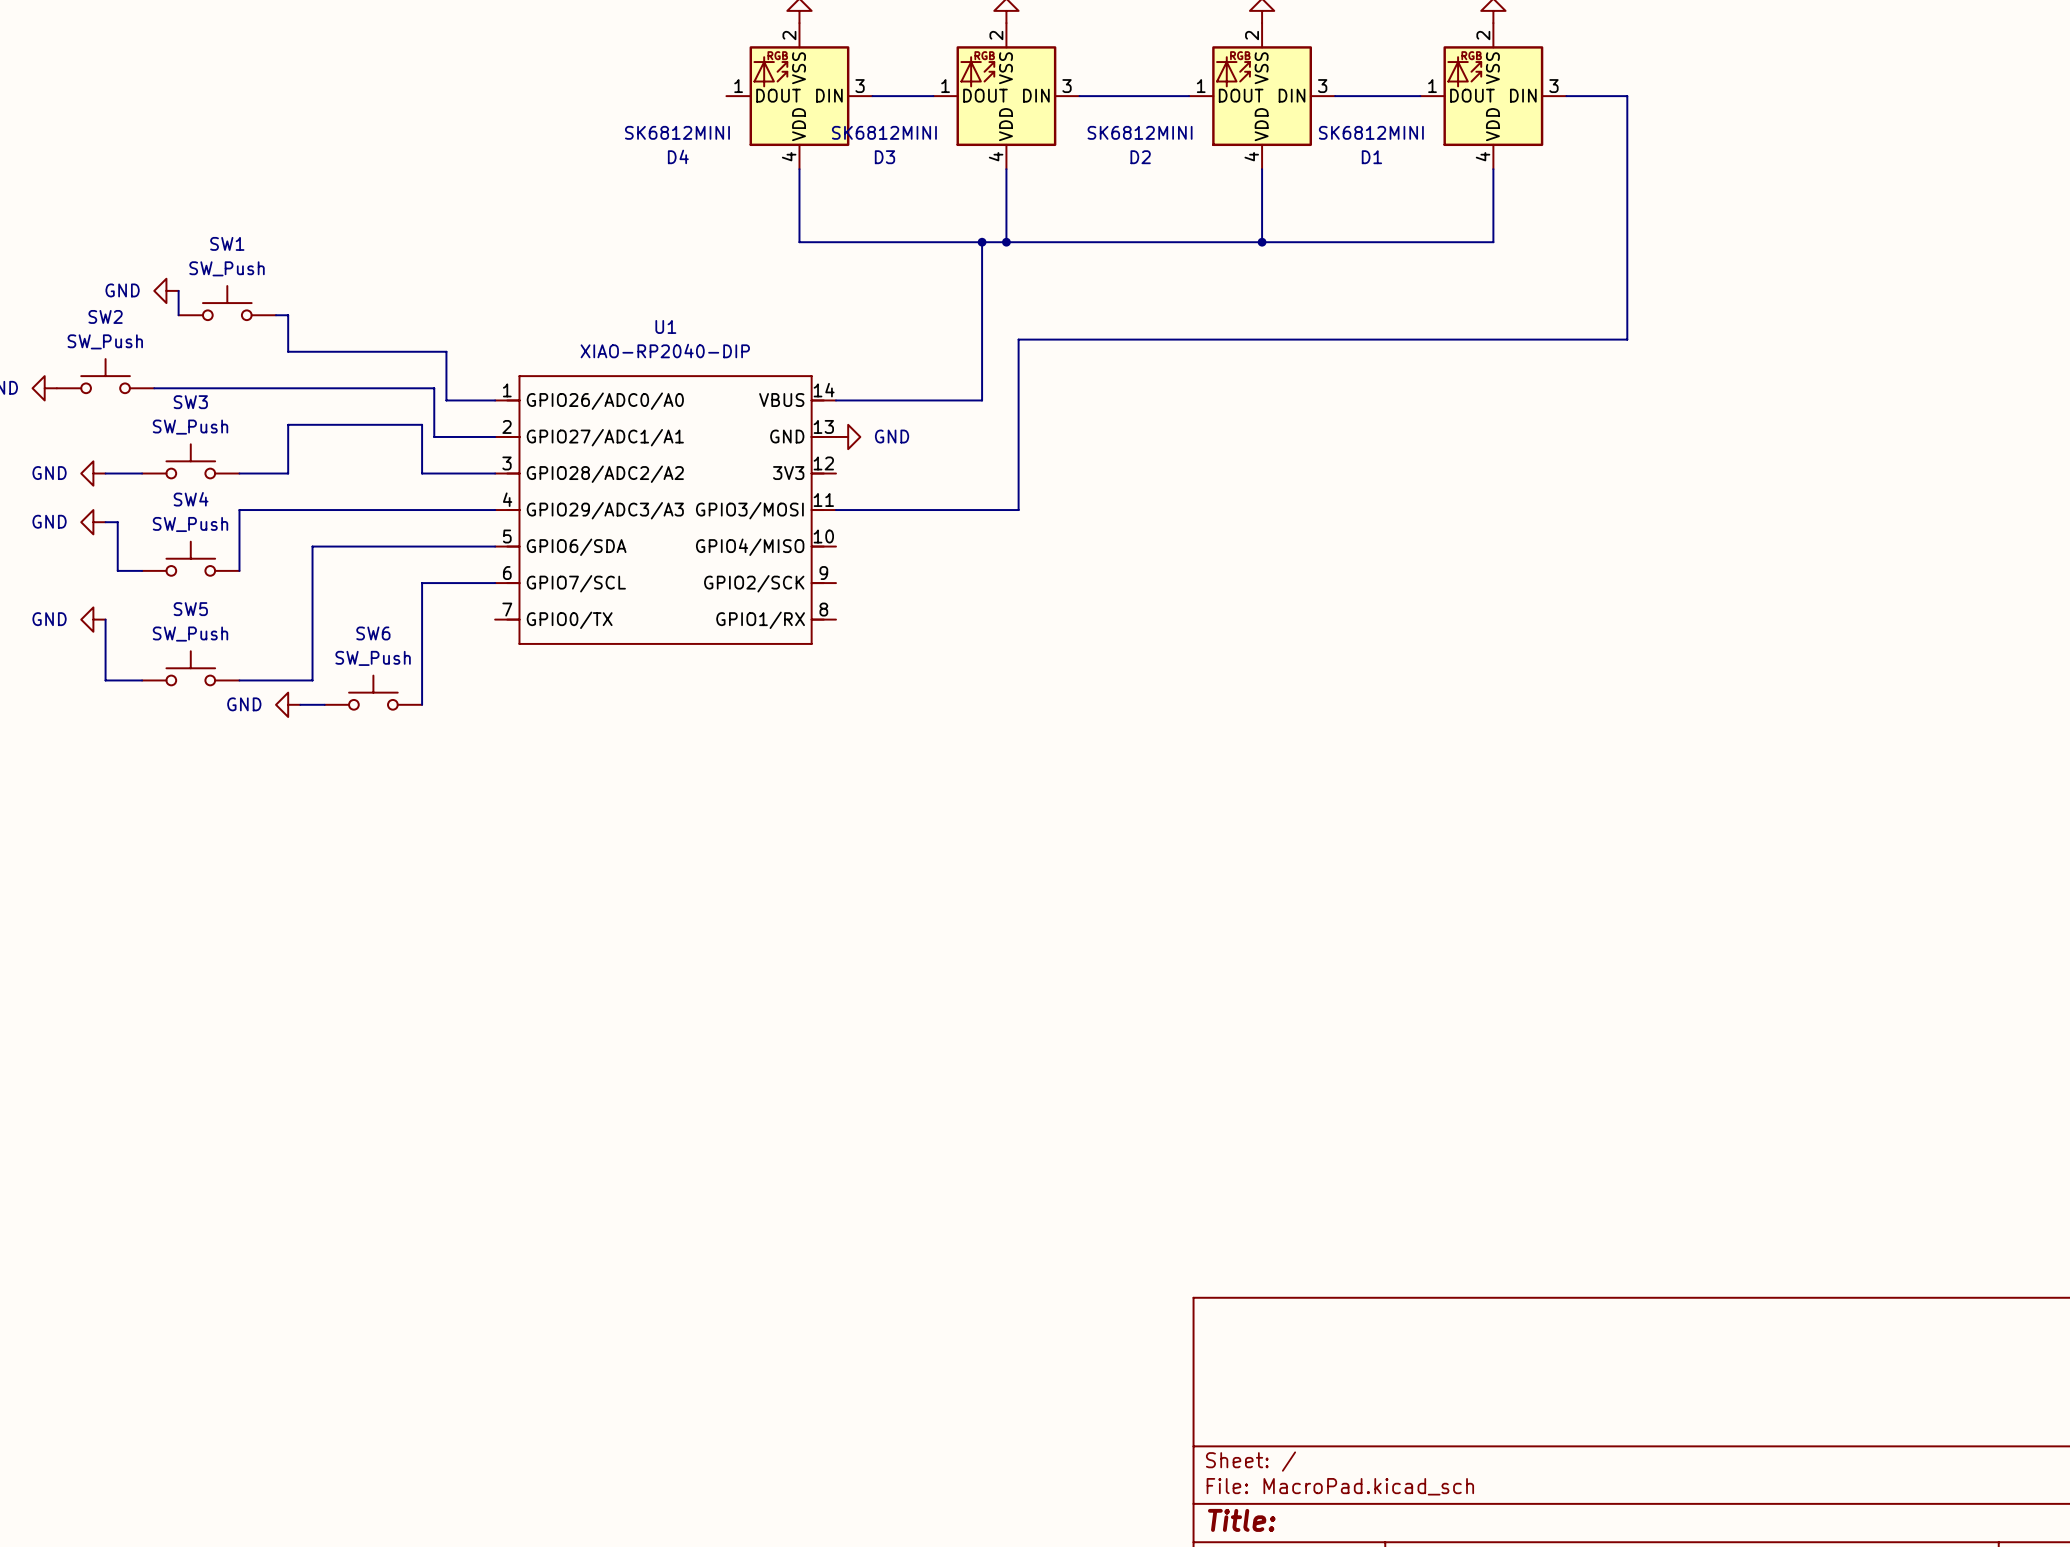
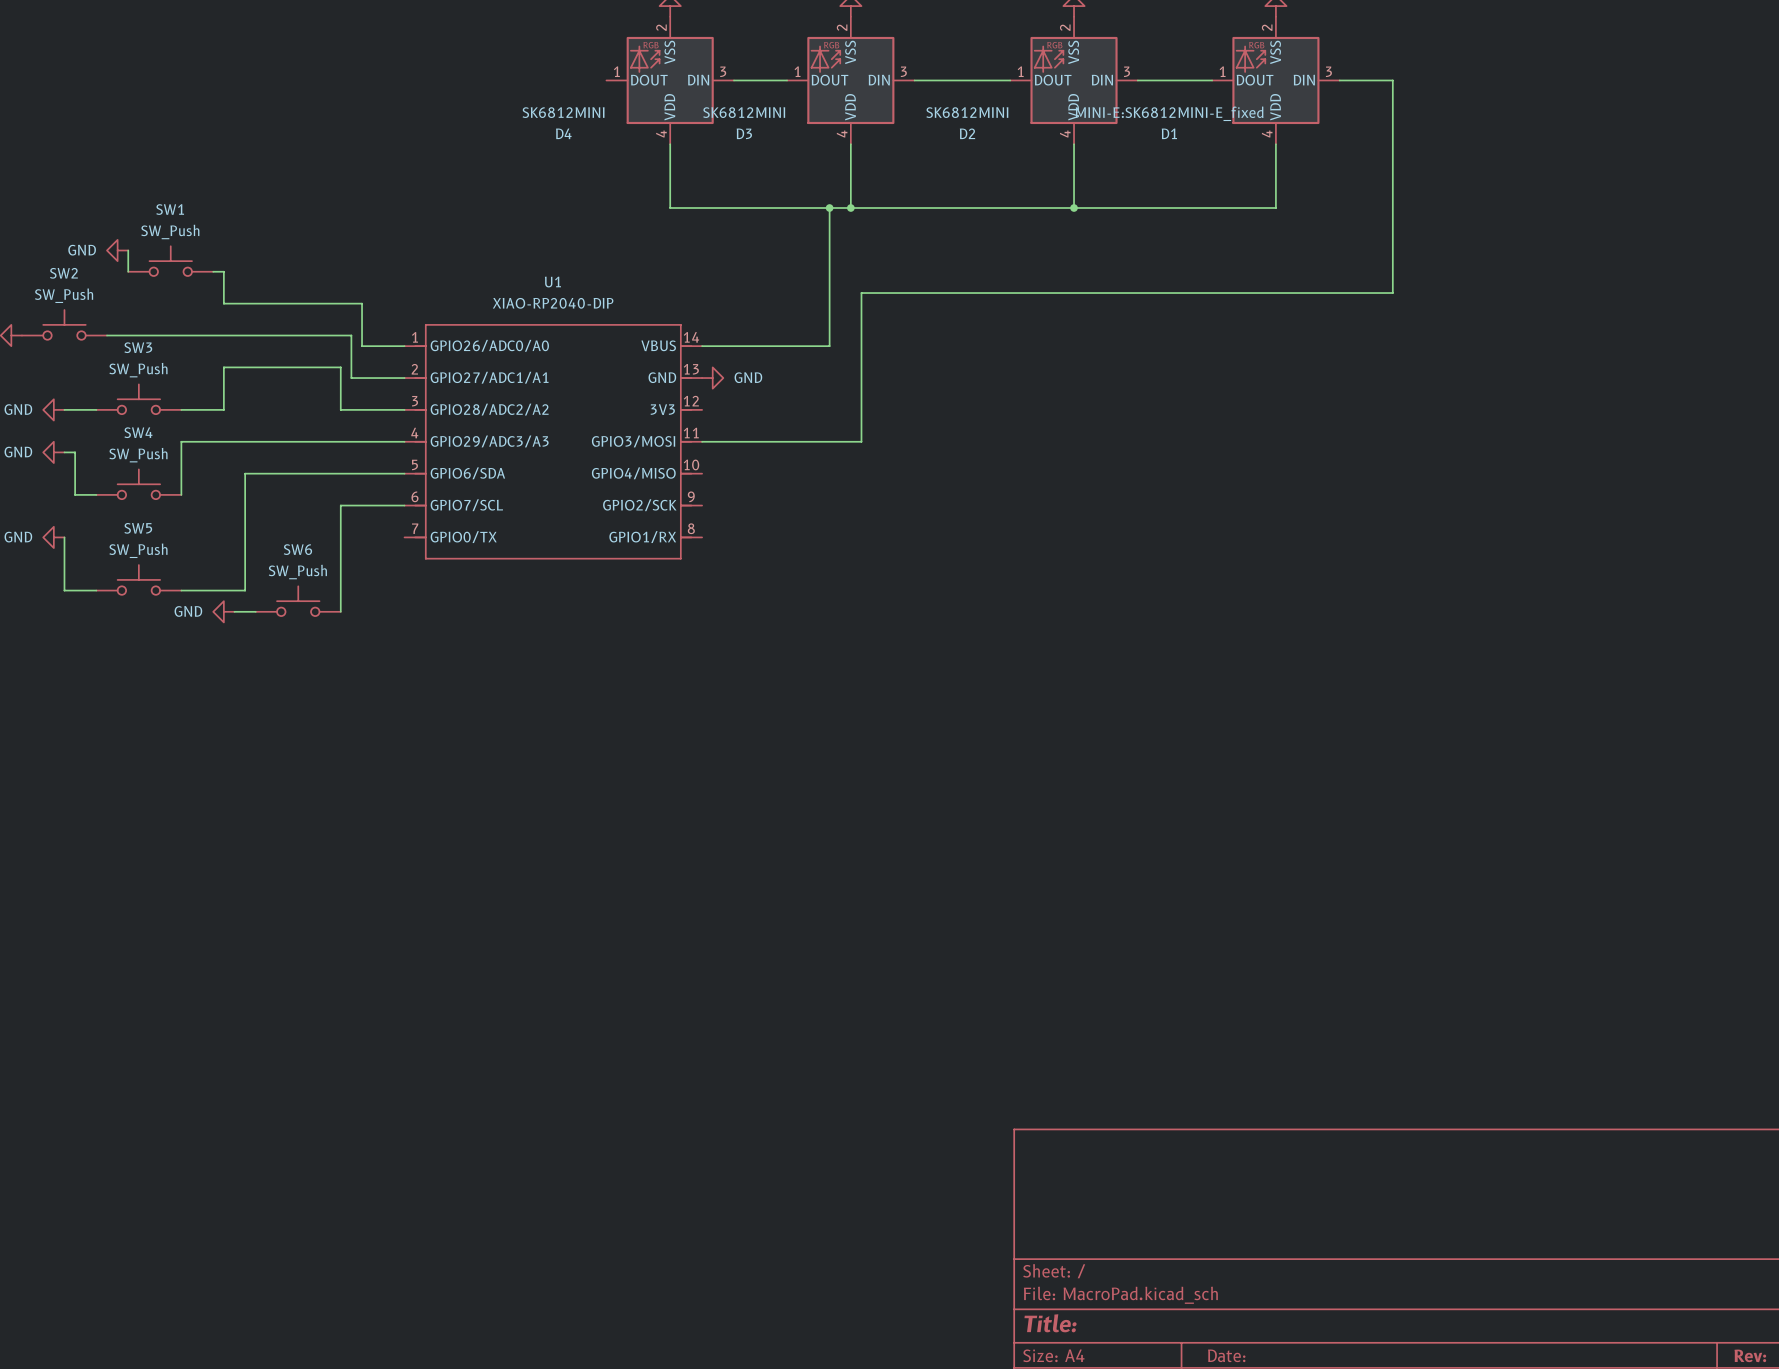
D1 value: SK6812MINI (1371, 132) -> MINI-E:SK6812MINI-E_fixed (1169, 113)

